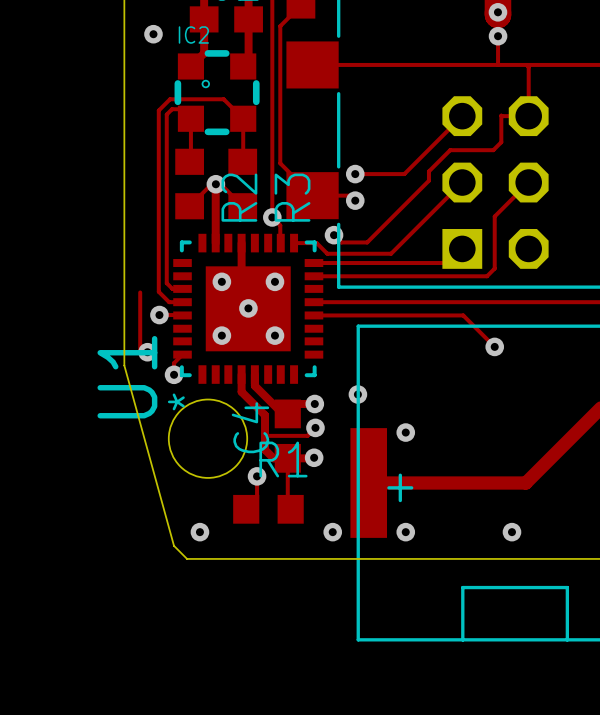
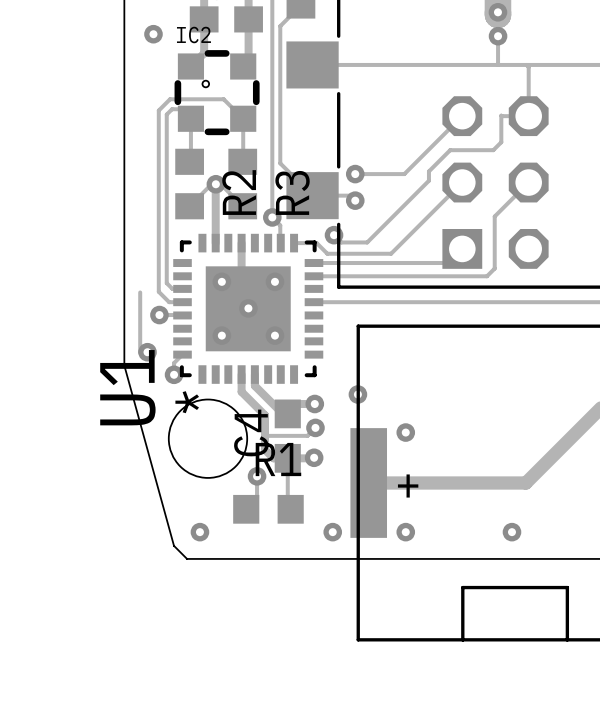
track: (313, 315) (463, 315) (494, 346) -> none
via: (494, 346) -> none

